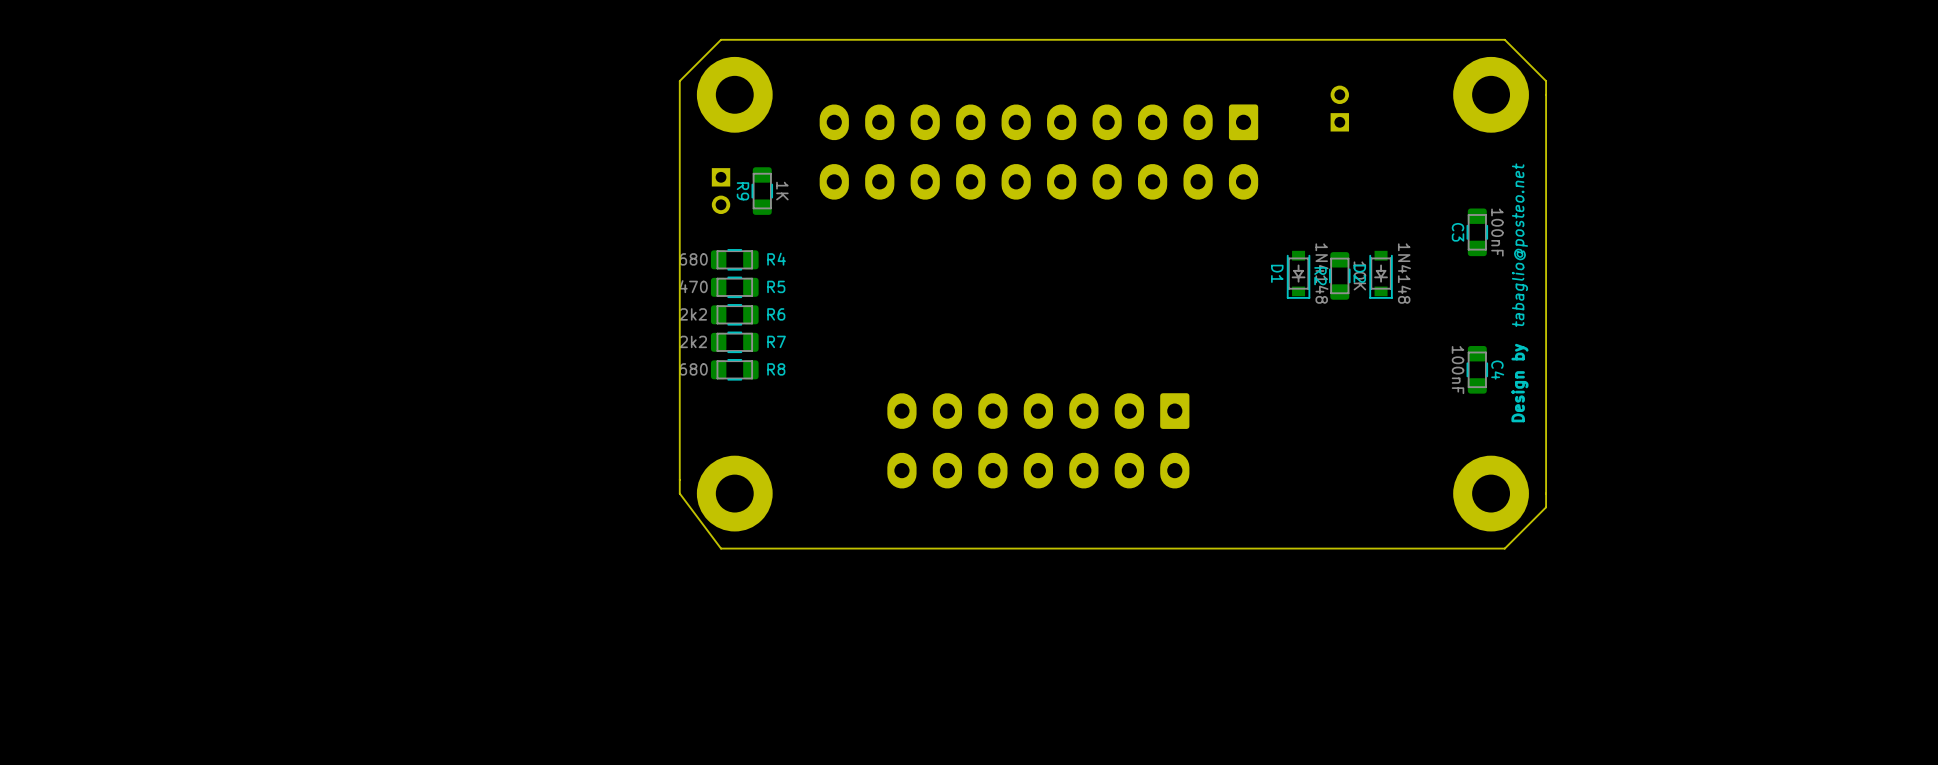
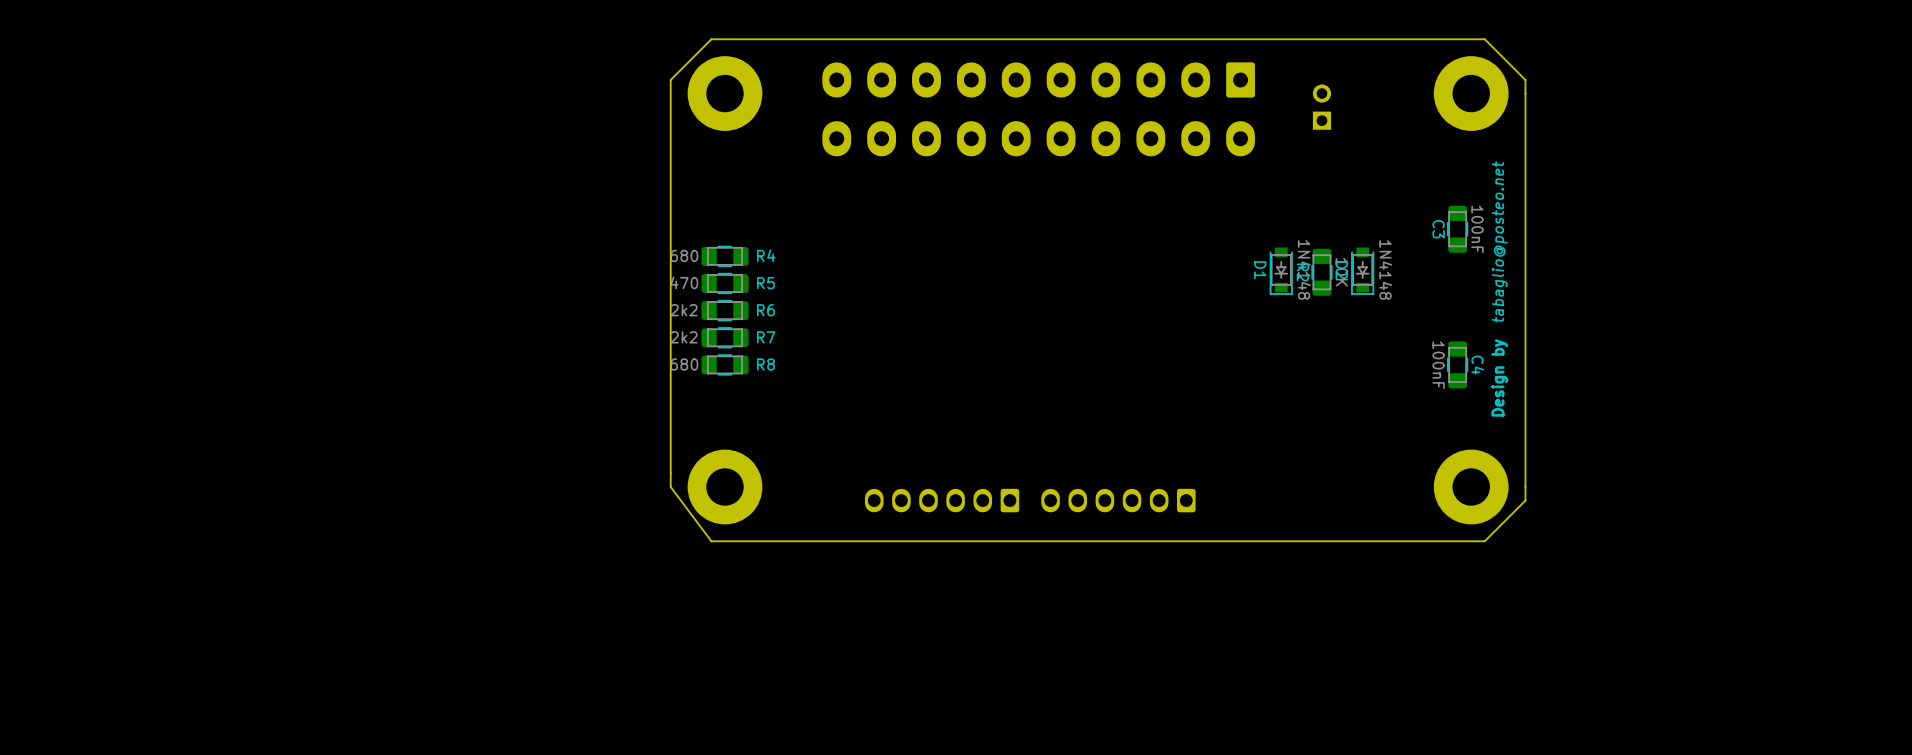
part position: (1038, 152) -> (1038, 109)
part: (721, 191) -> none
R9: 1K (762, 191) -> none
part: (1038, 440) -> none
part: none -> (942, 500)
part: none -> (1118, 500)

